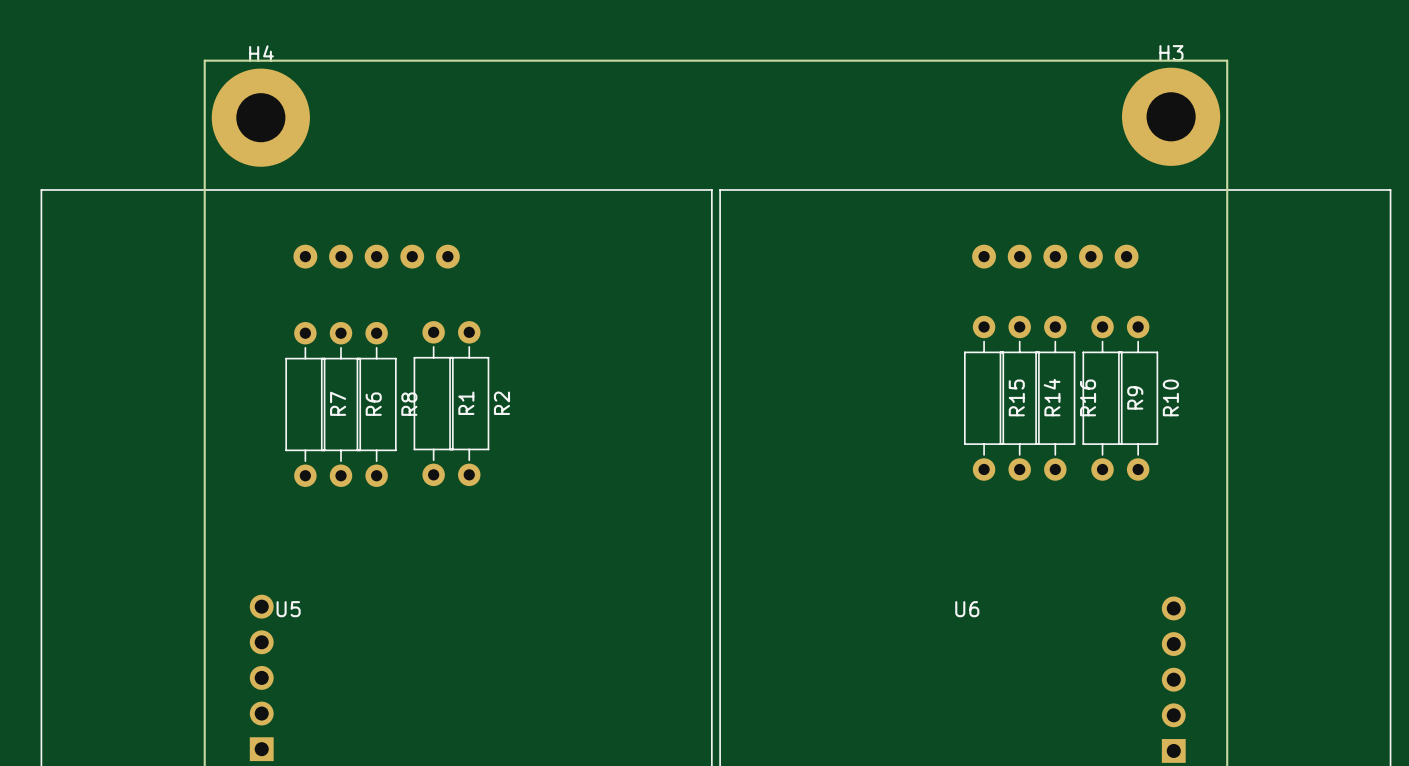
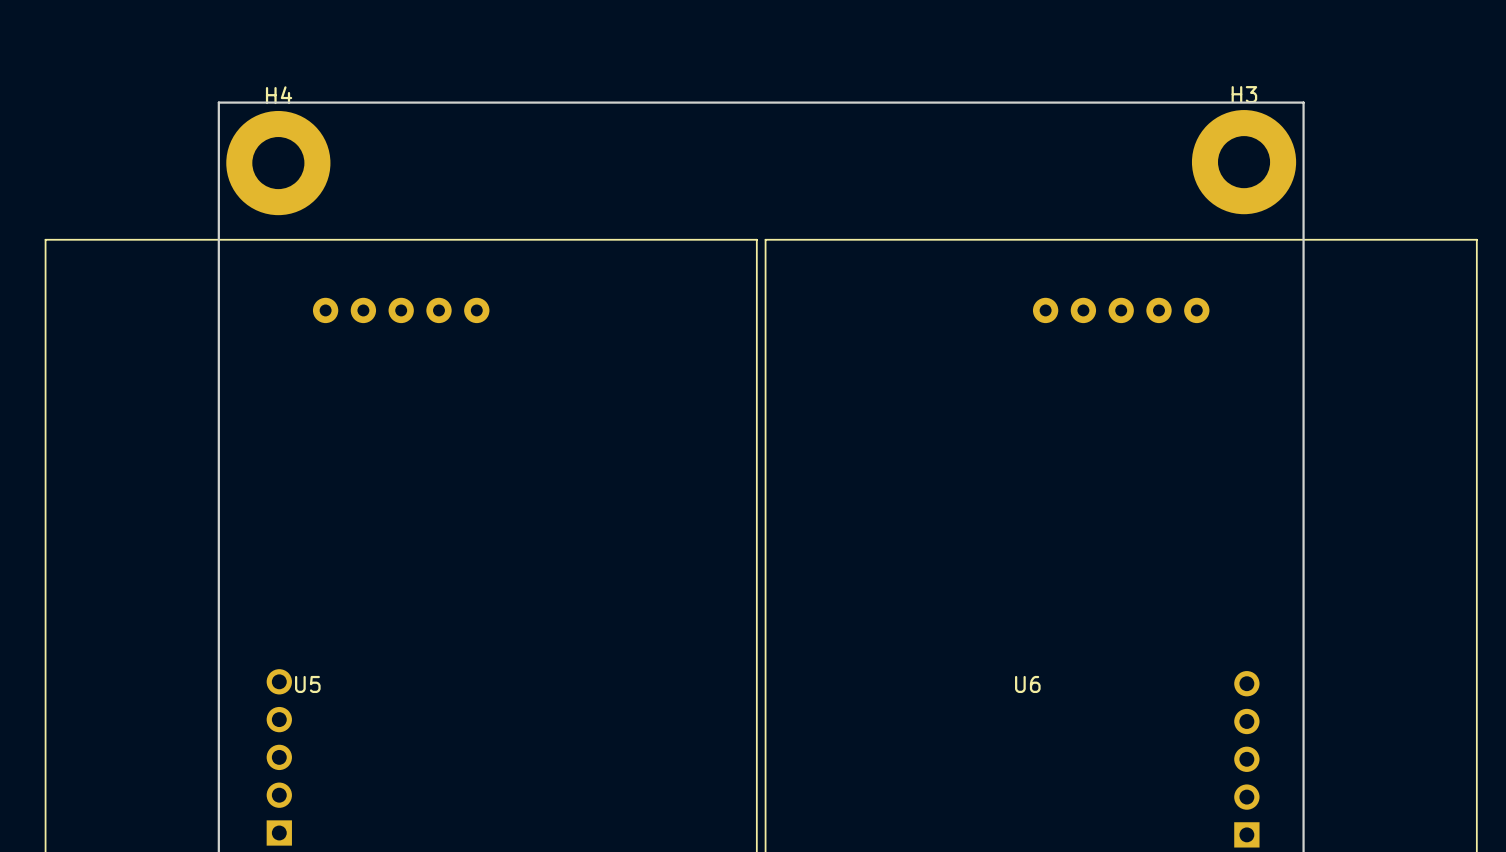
R15: (984, 398) -> none
R14: (1019, 398) -> none
R16: (1055, 398) -> none
R9: (1102, 398) -> none
R10: (1138, 398) -> none
R1: (433, 403) -> none
R2: (469, 403) -> none
R7: (305, 404) -> none
R6: (341, 404) -> none
R8: (376, 404) -> none

